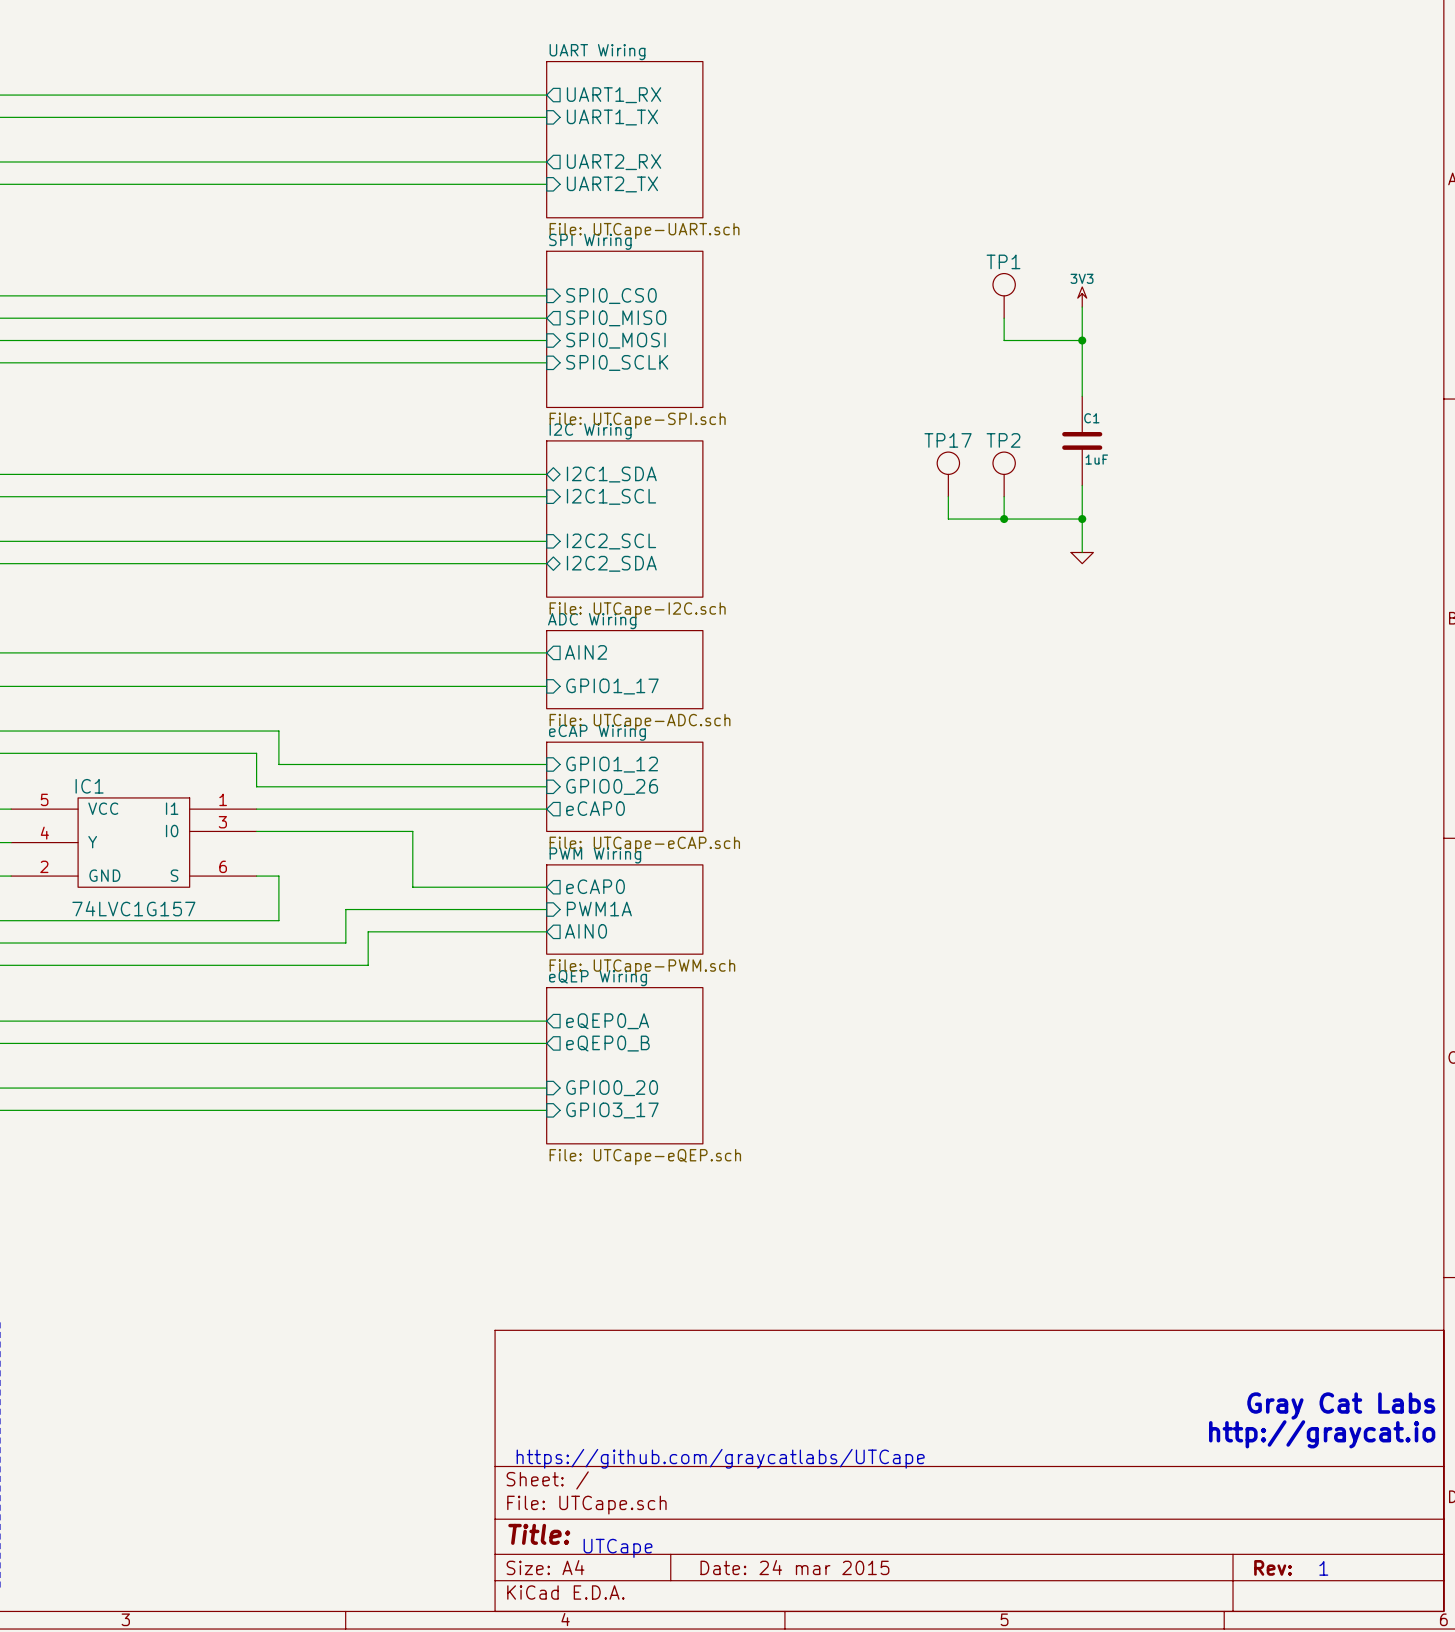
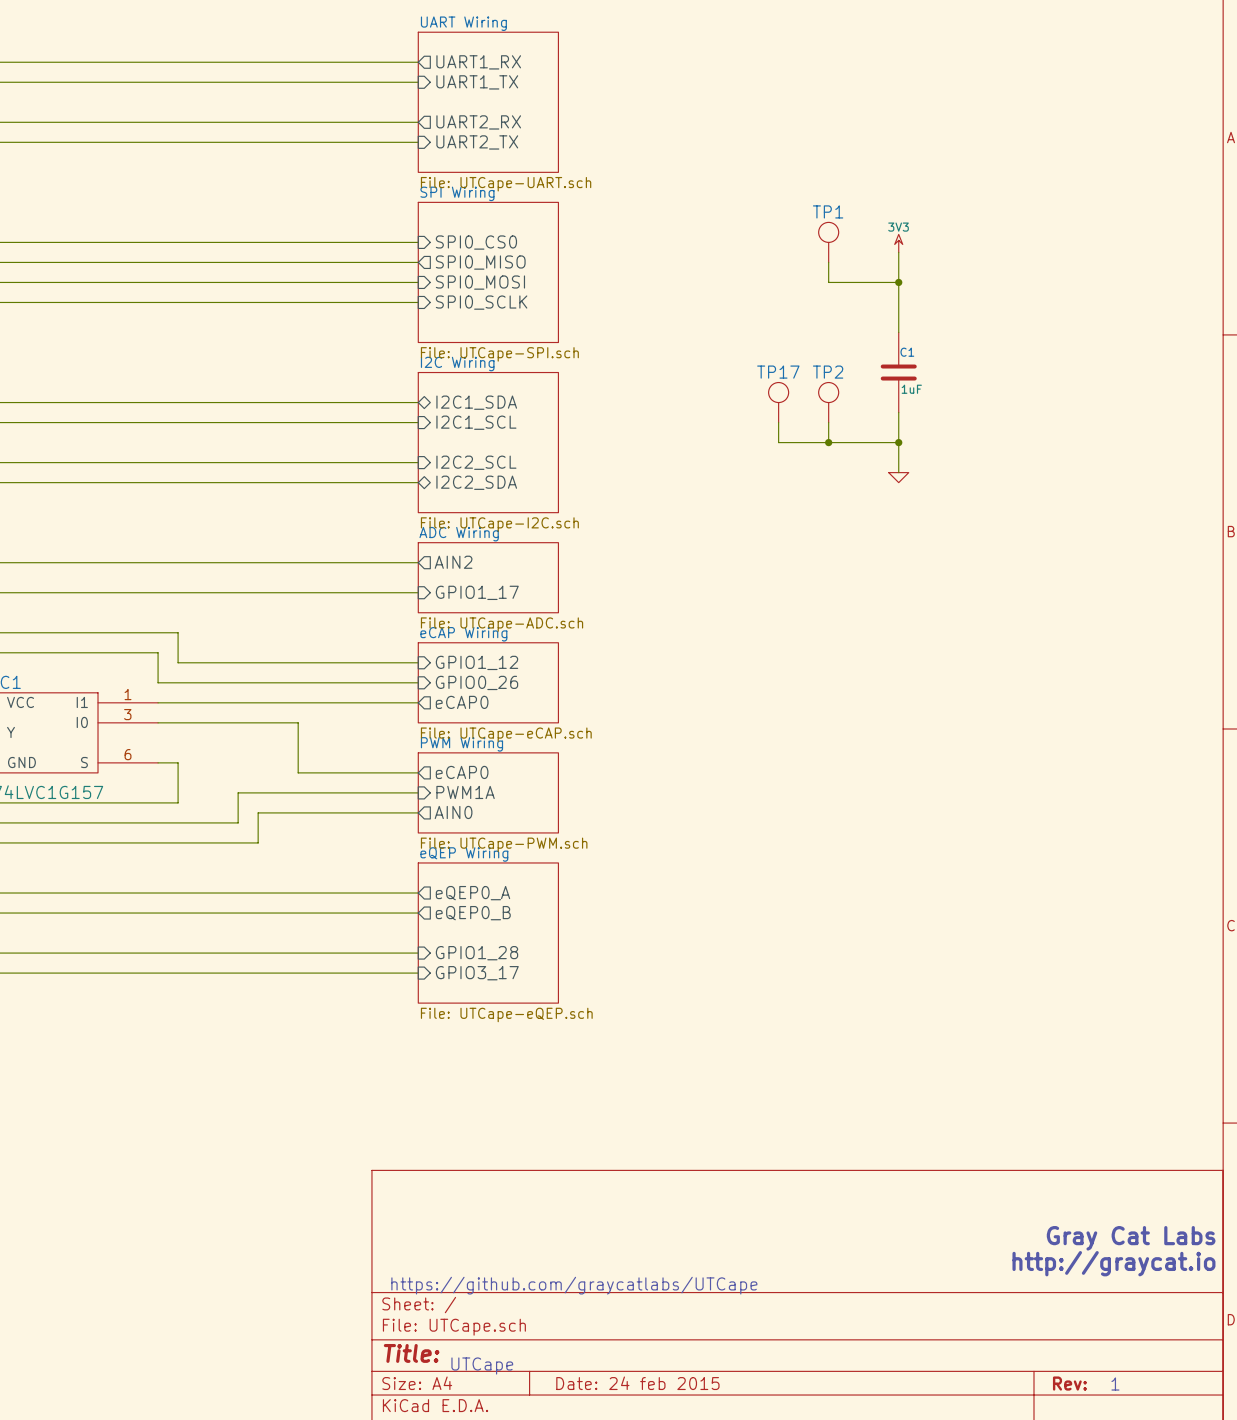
sheet pin: GPIO0_20 (612, 1088) -> GPIO1_28 (476, 953)
title block: Date: 24 mar 2015 (794, 1567) -> Date: 24 feb 2015 (637, 1383)

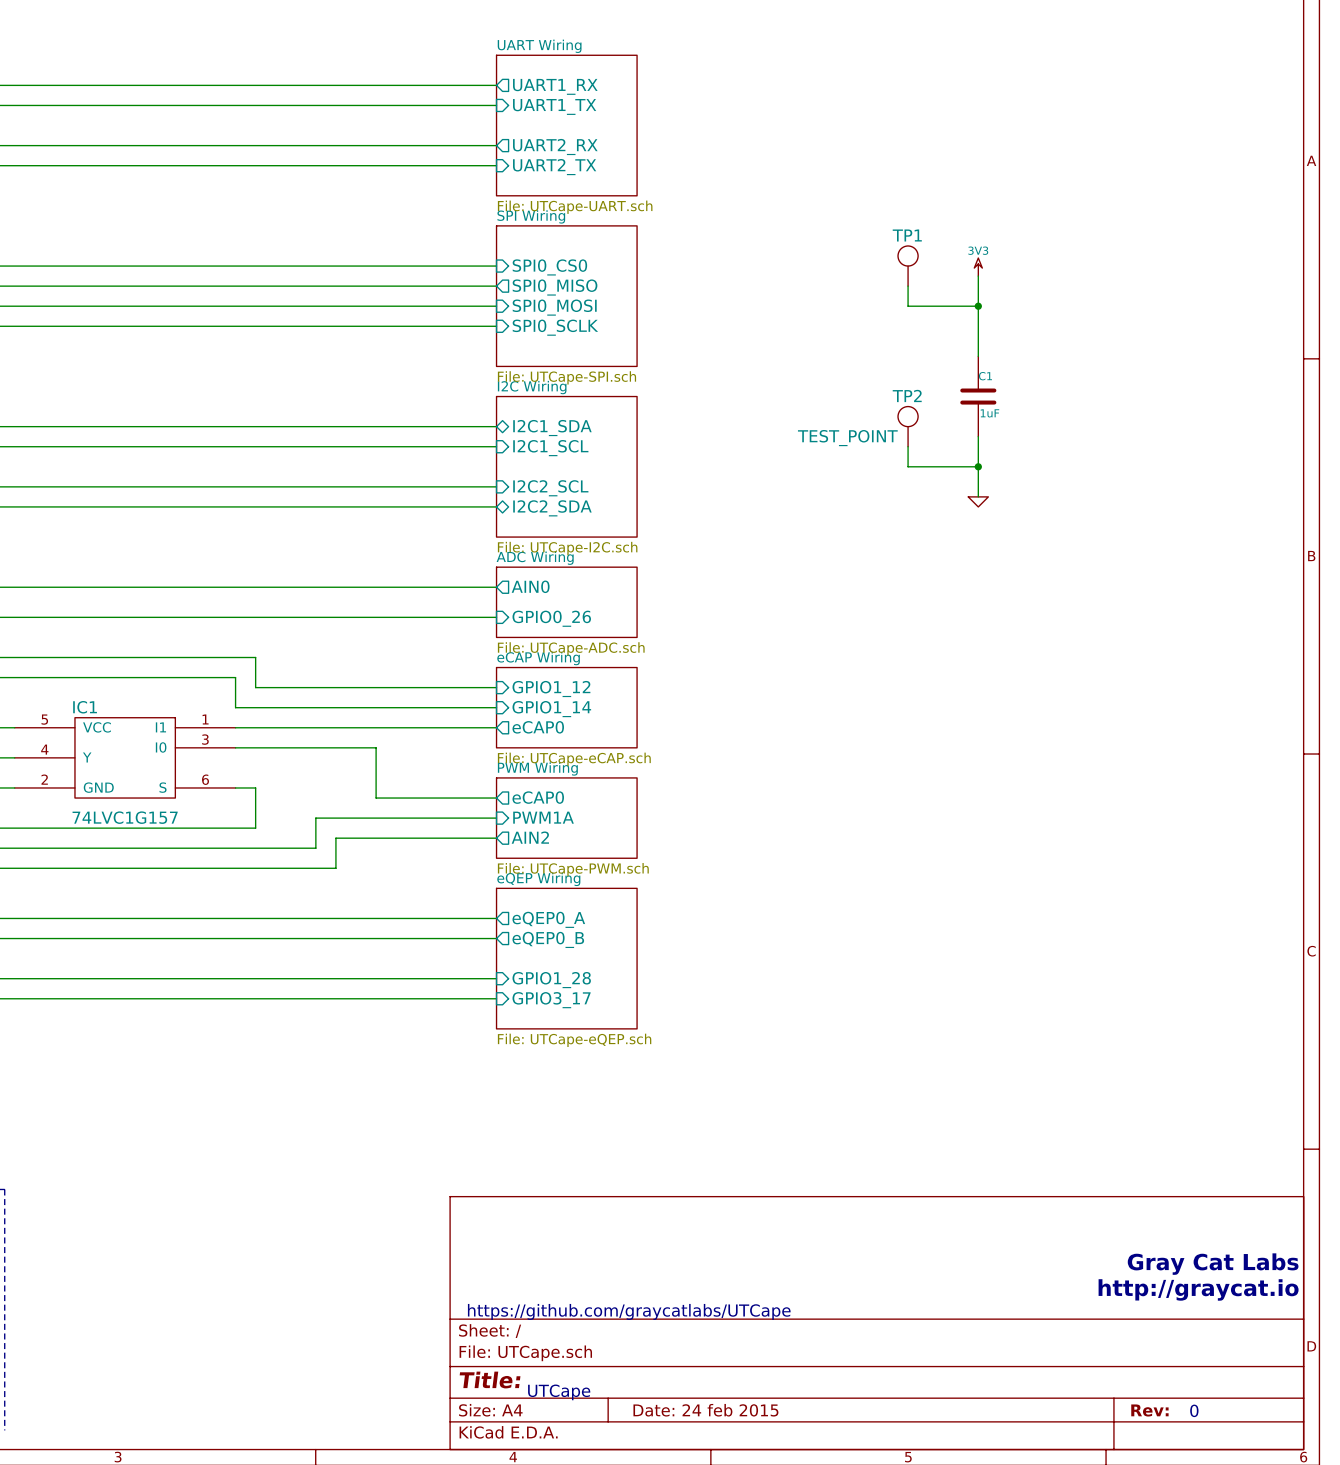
TP17: (778, 402) -> none
TP2 value: none -> TEST_POINT (847, 438)
wire: (778, 422) (778, 442) (828, 442) -> none
junction: (828, 442) -> none
sheet pin: AIN2 (453, 562) -> AIN0 (530, 586)
sheet pin: GPIO1_17 (477, 592) -> GPIO0_26 (551, 618)
sheet pin: GPIO0_26 (476, 682) -> GPIO1_14 (551, 709)
sheet pin: AIN0 (453, 812) -> AIN2 (530, 837)
text: 1 (1115, 1384) -> 0 (1194, 1410)

